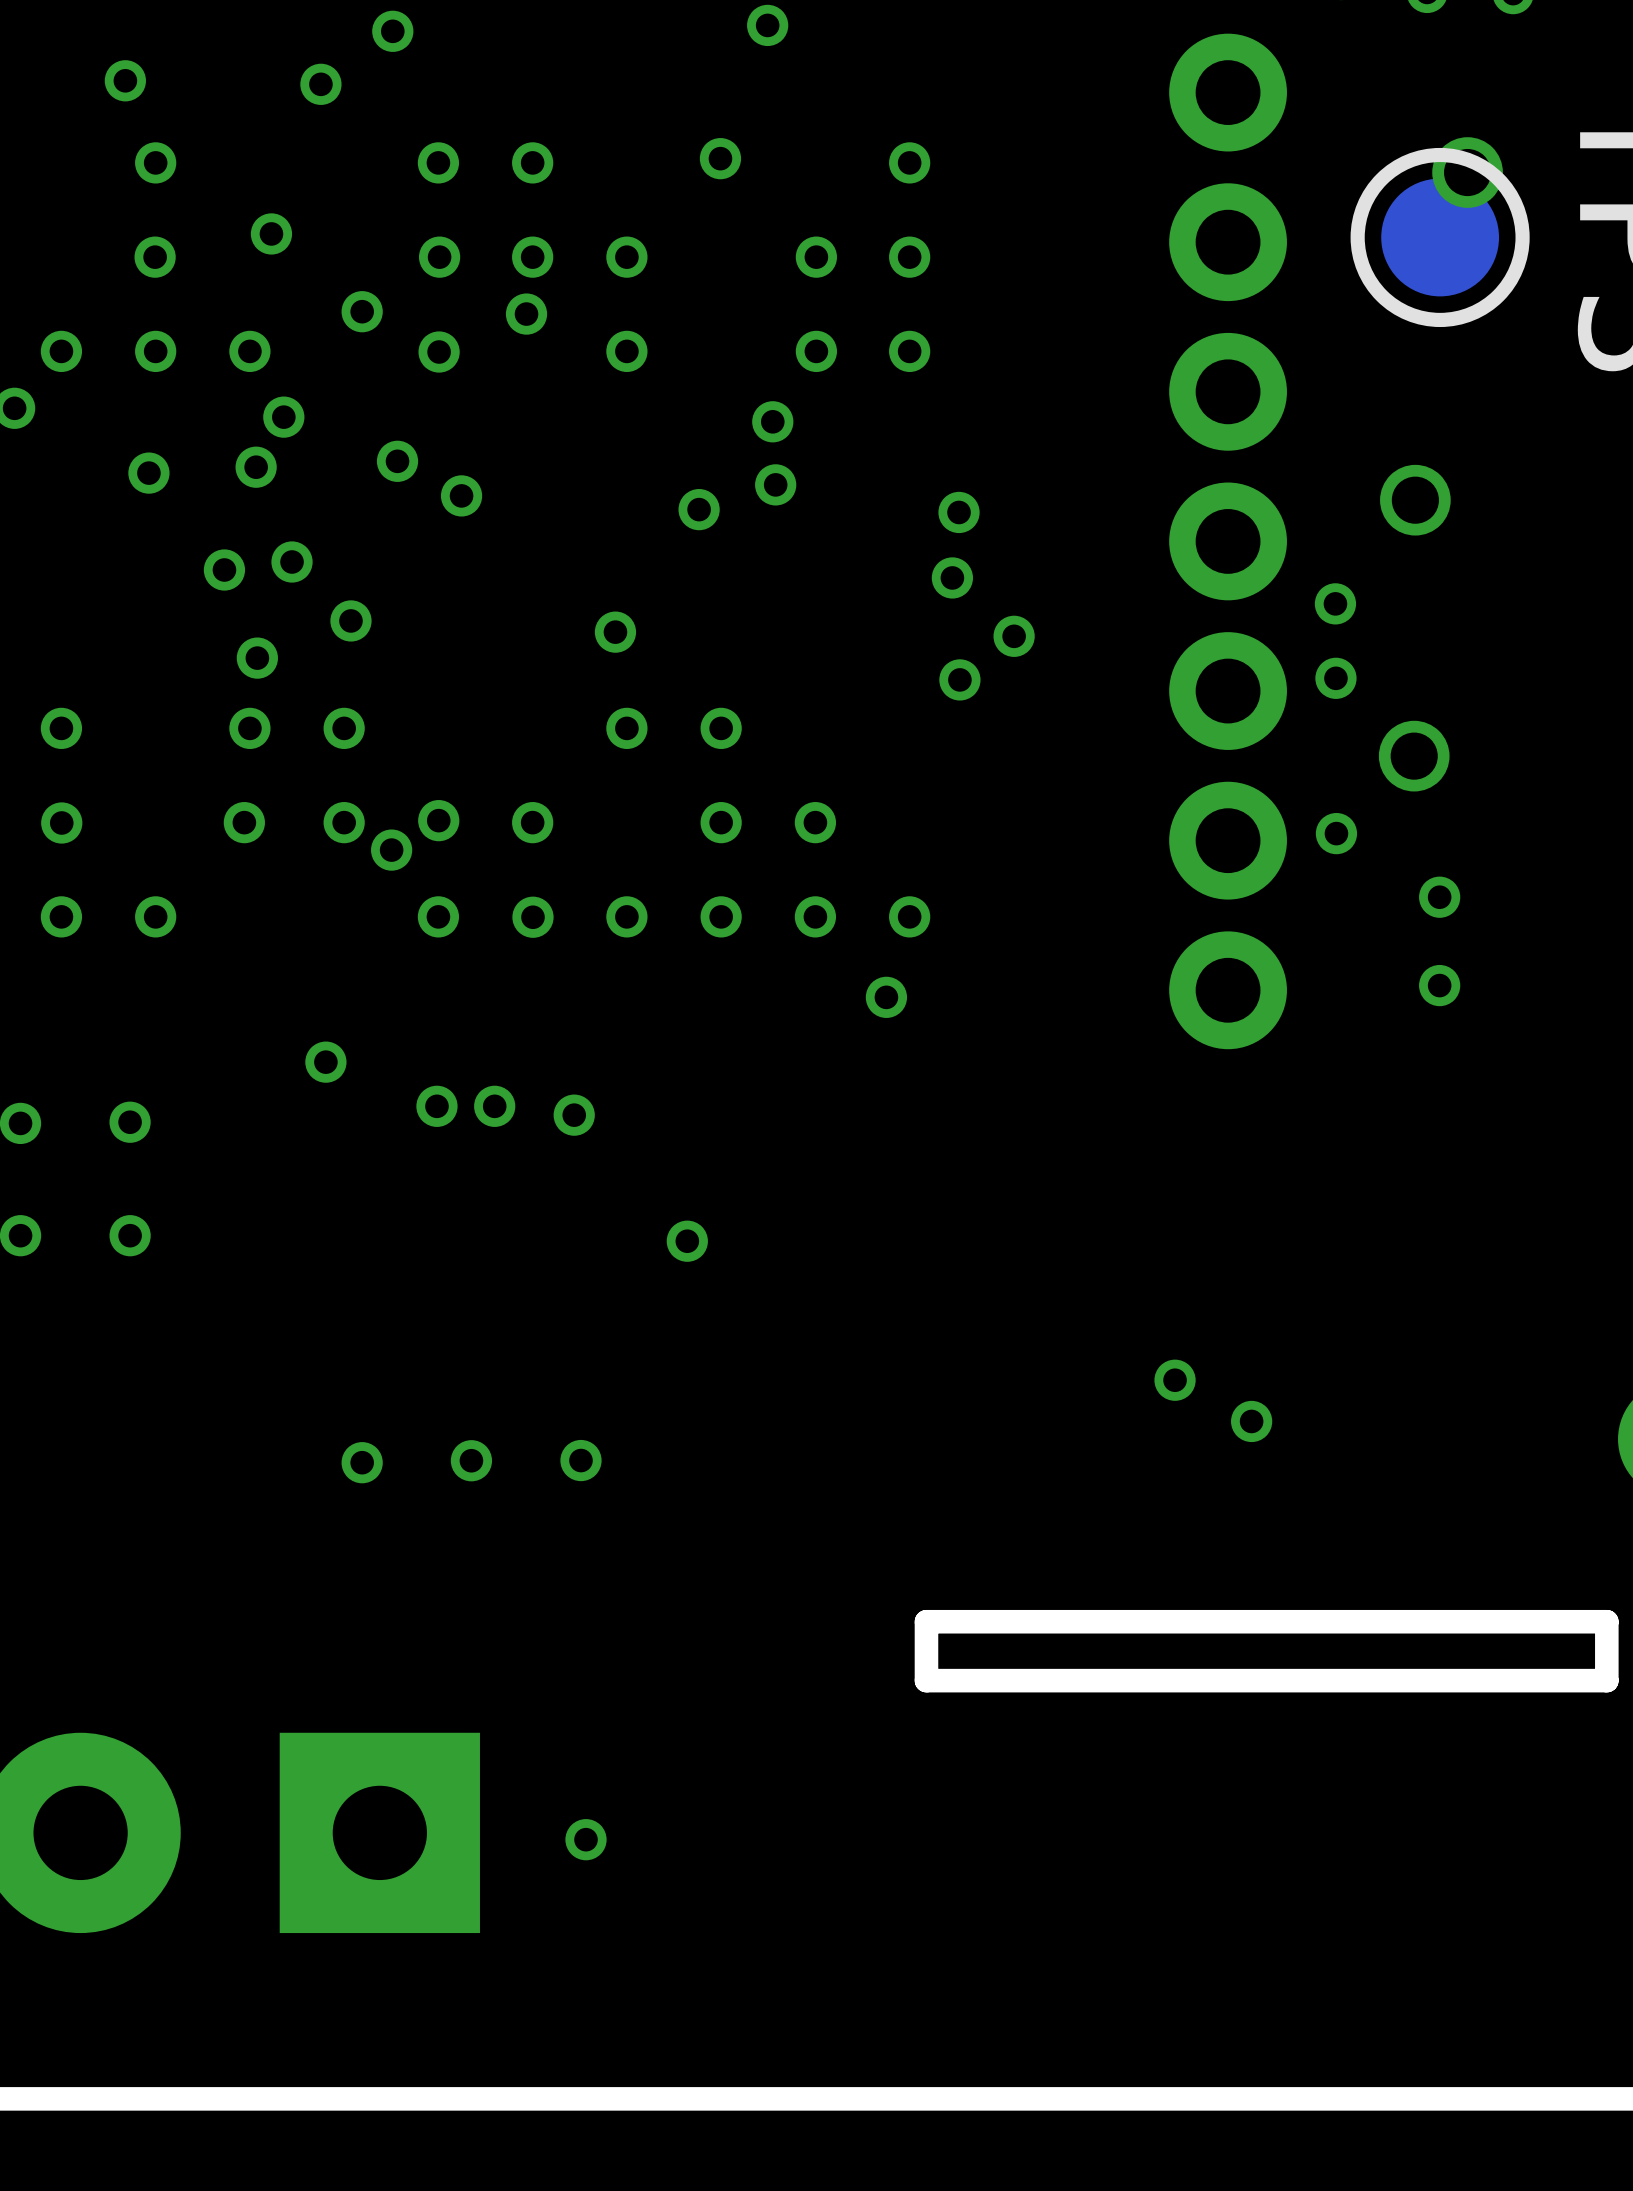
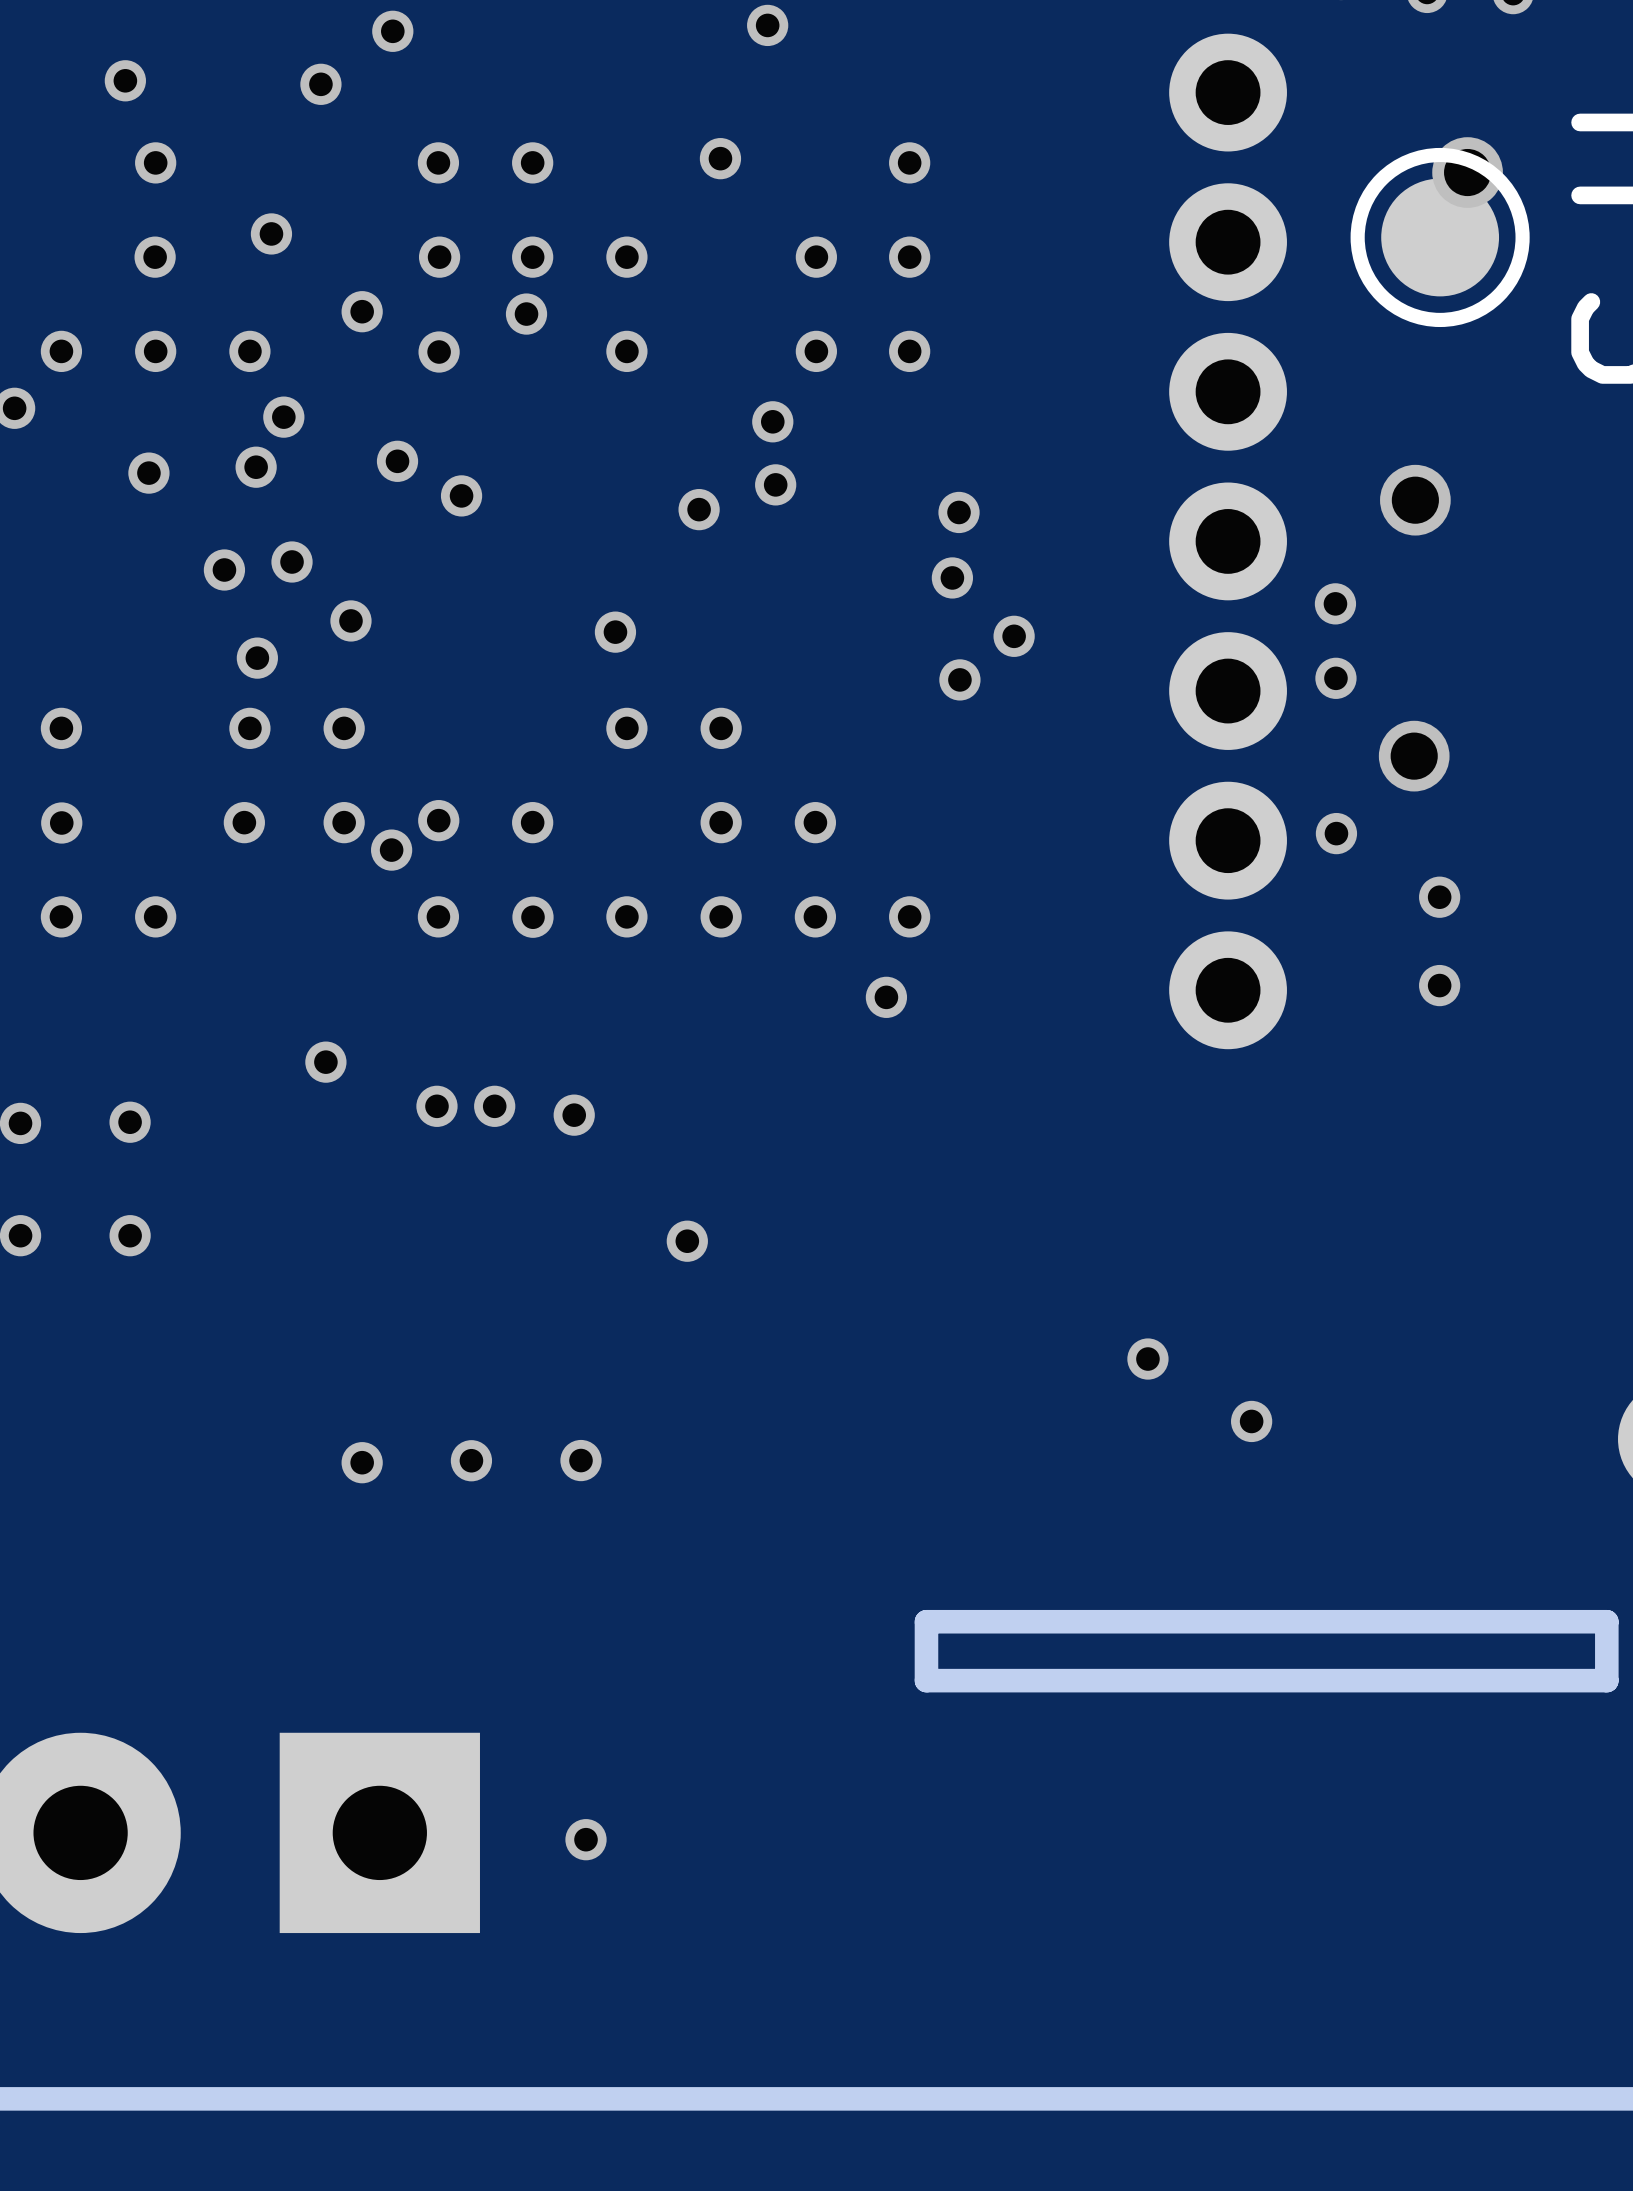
via position: (1175, 1380) -> (1147, 1359)

